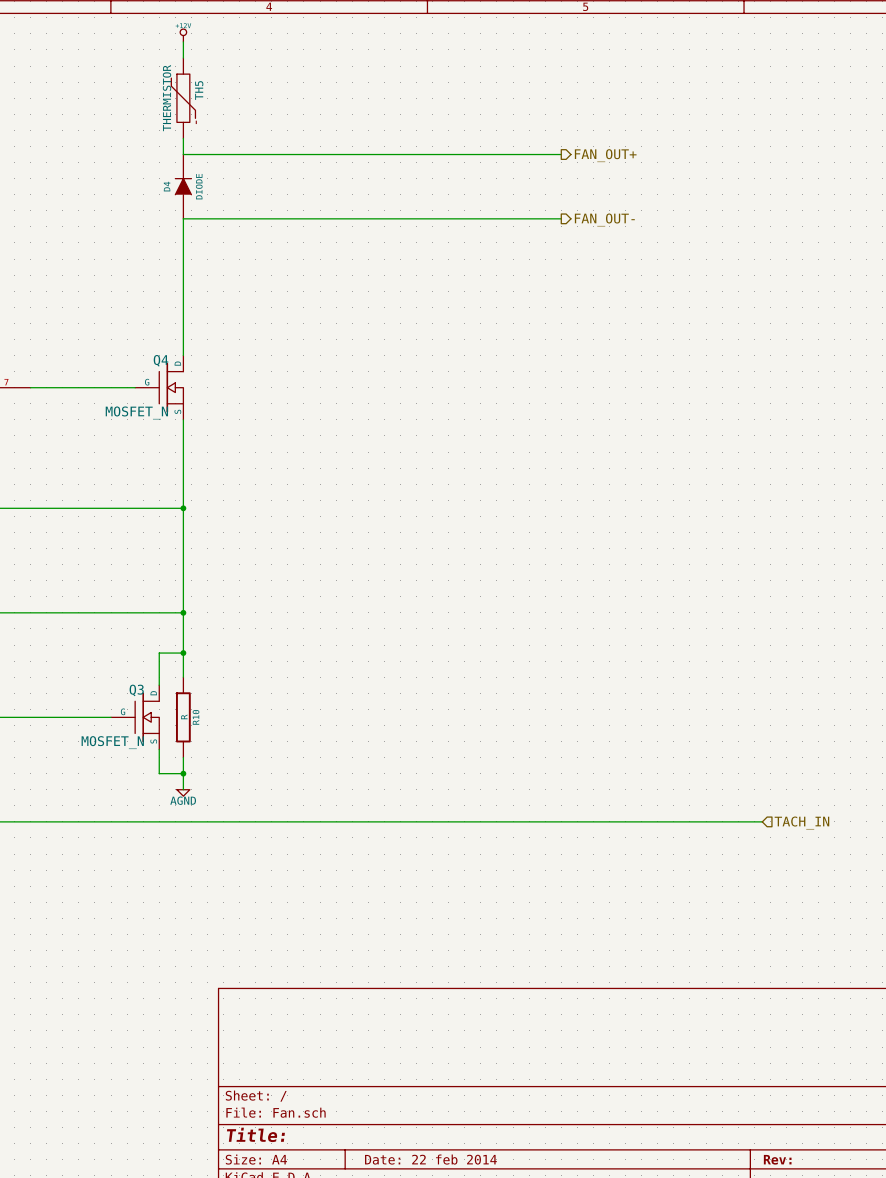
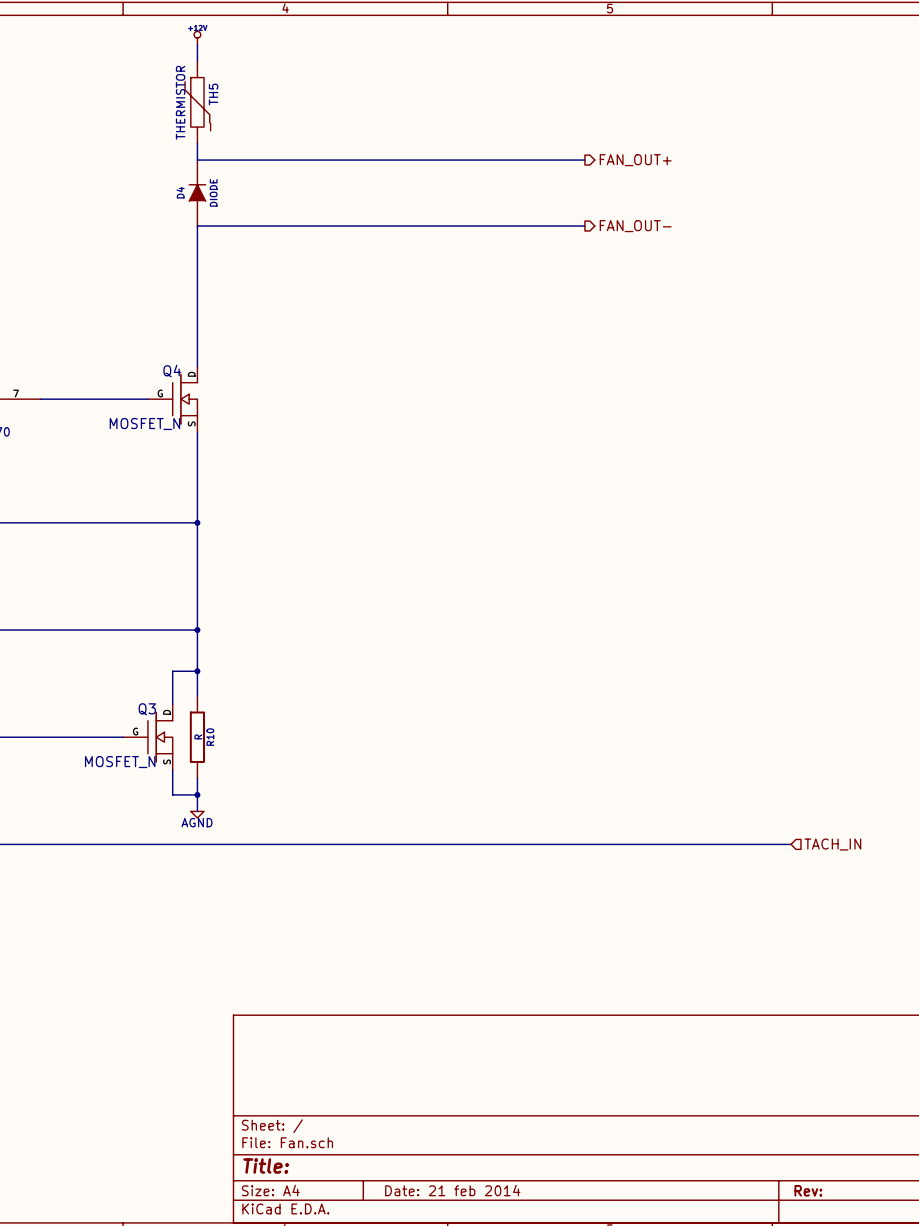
title block: Date: 22 feb 2014 (430, 1159) -> Date: 21 feb 2014 (452, 1190)

